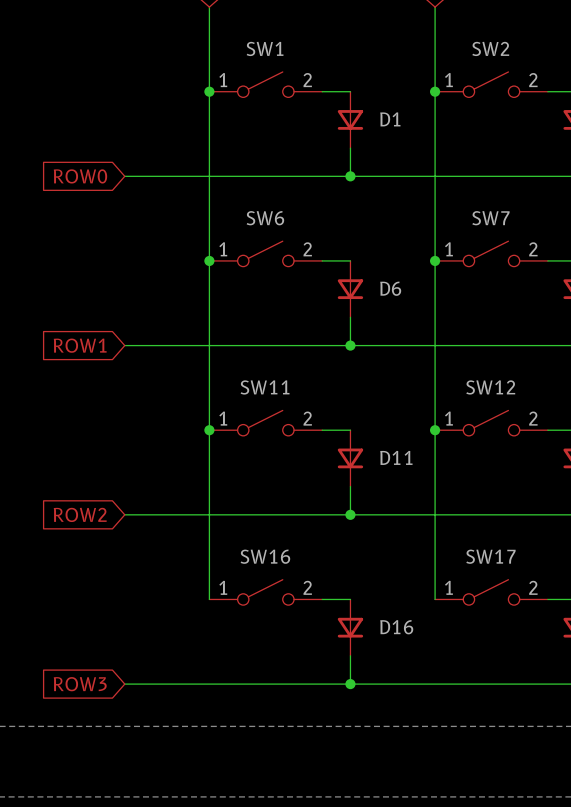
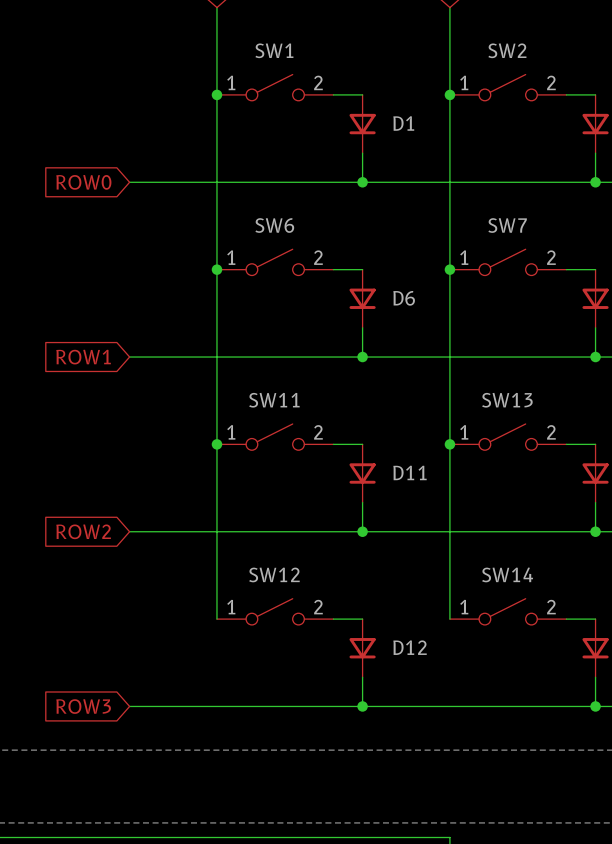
SW12 name: SW12 (490, 387) -> SW13 (507, 400)
SW16 name: SW16 (265, 556) -> SW12 (274, 574)
SW17 name: SW17 (490, 556) -> SW14 (507, 574)
D16 name: D16 (396, 627) -> D12 (410, 647)

